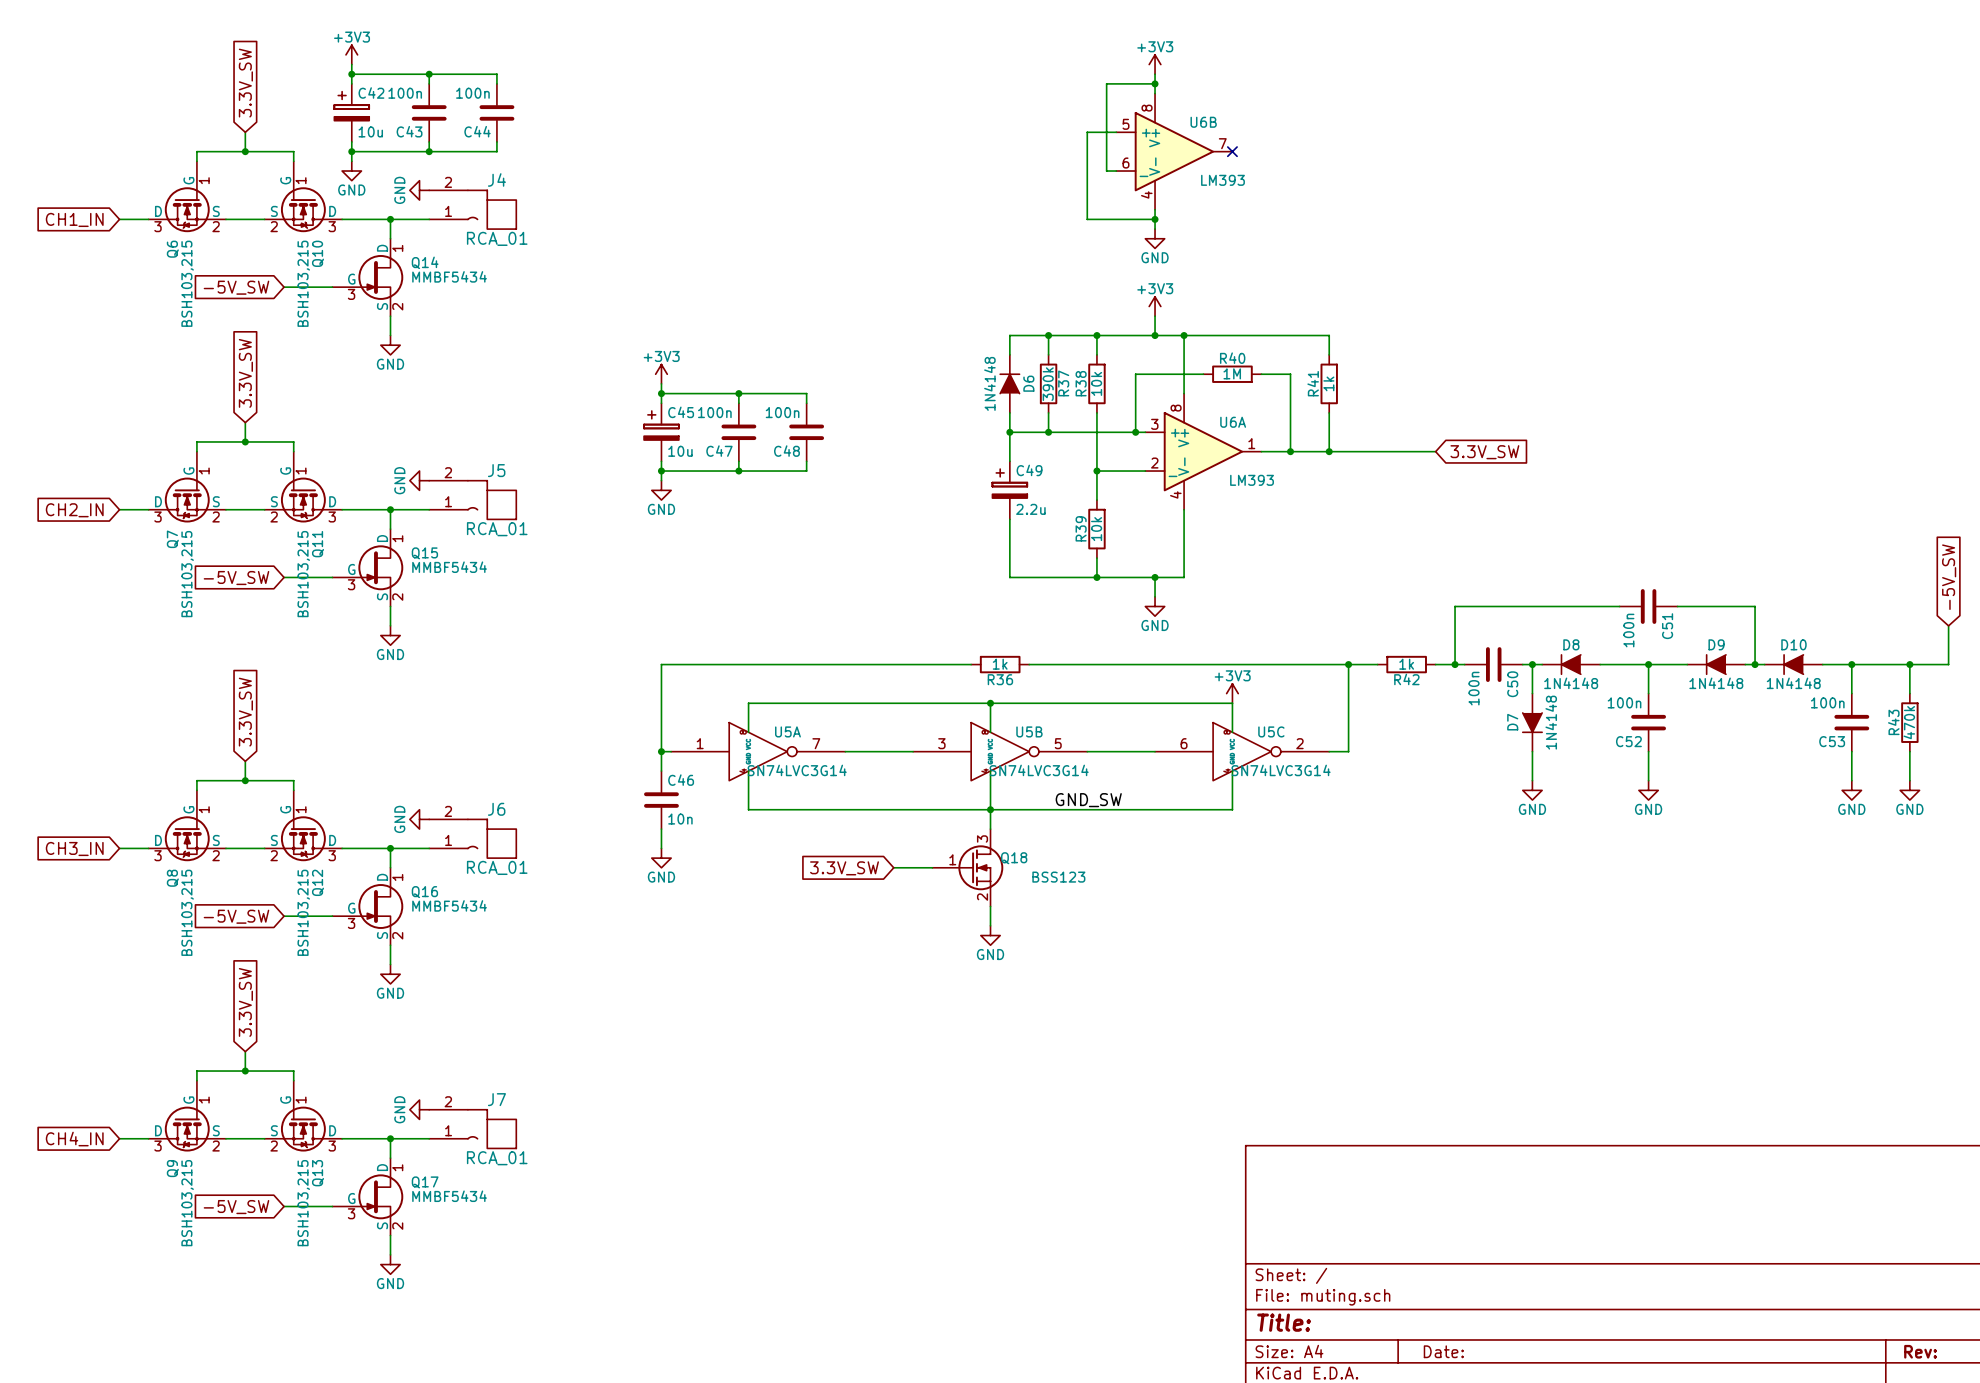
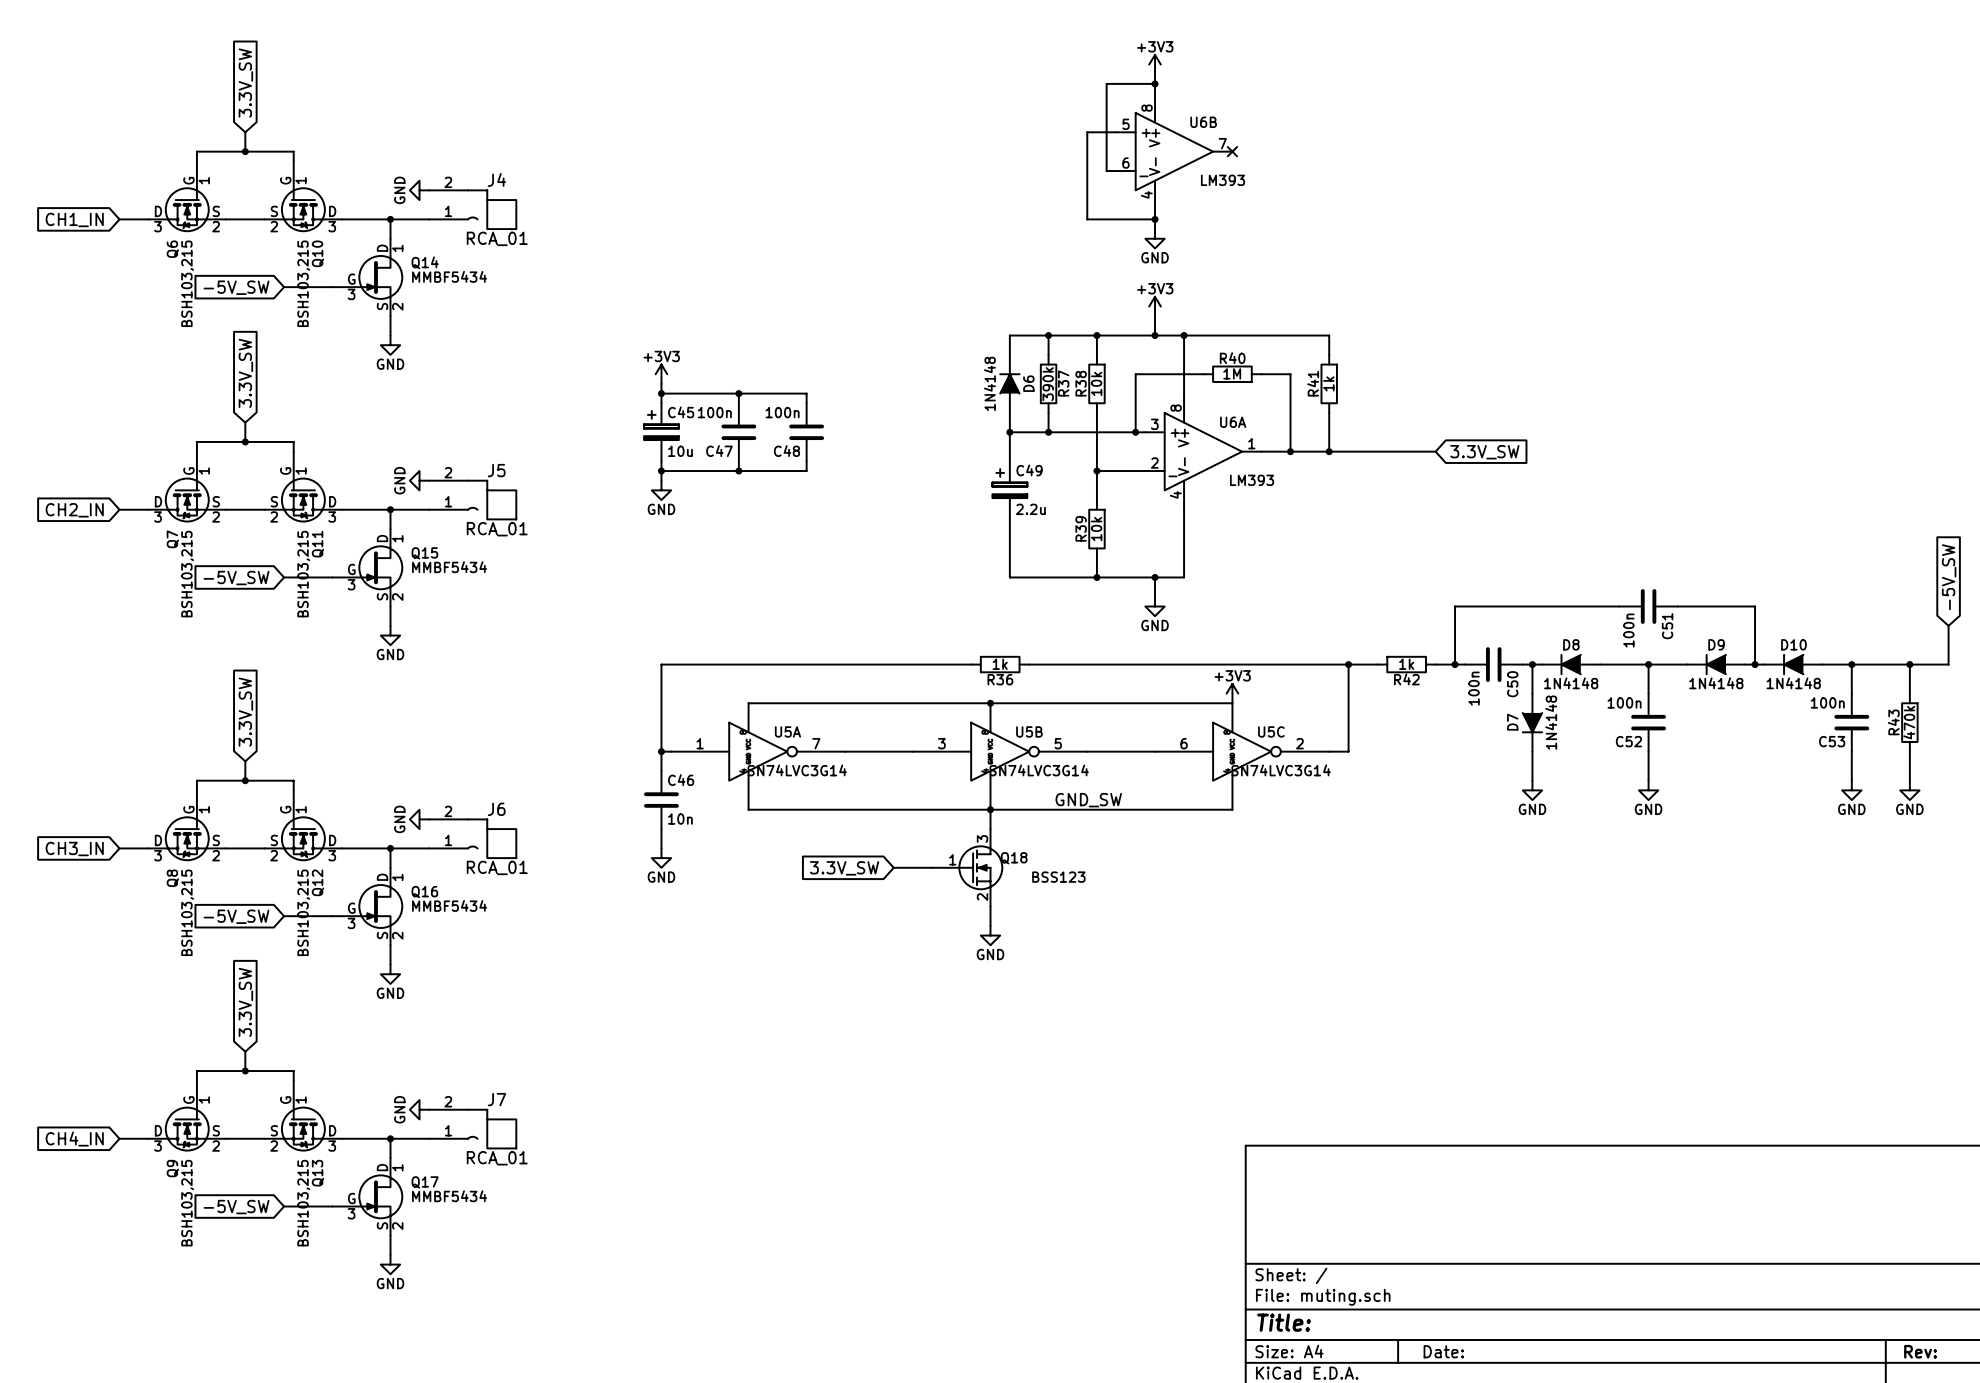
power symbol: +3V3 (351, 54) -> none
wire: (351, 64) (351, 83) -> none
wire: (351, 74) (496, 74) (496, 83) -> none
junction: (351, 74) -> none
wire: (429, 74) (429, 83) -> none
junction: (429, 74) -> none
C42: 10u (351, 112) -> none
C43: 100n (429, 112) -> none
C44: 100n (496, 112) -> none
wire: (351, 141) (351, 161) -> none
wire: (429, 141) (429, 151) -> none
wire: (496, 141) (496, 151) (351, 151) -> none
junction: (351, 151) -> none
junction: (429, 151) -> none
power symbol: GND (351, 171) -> none

